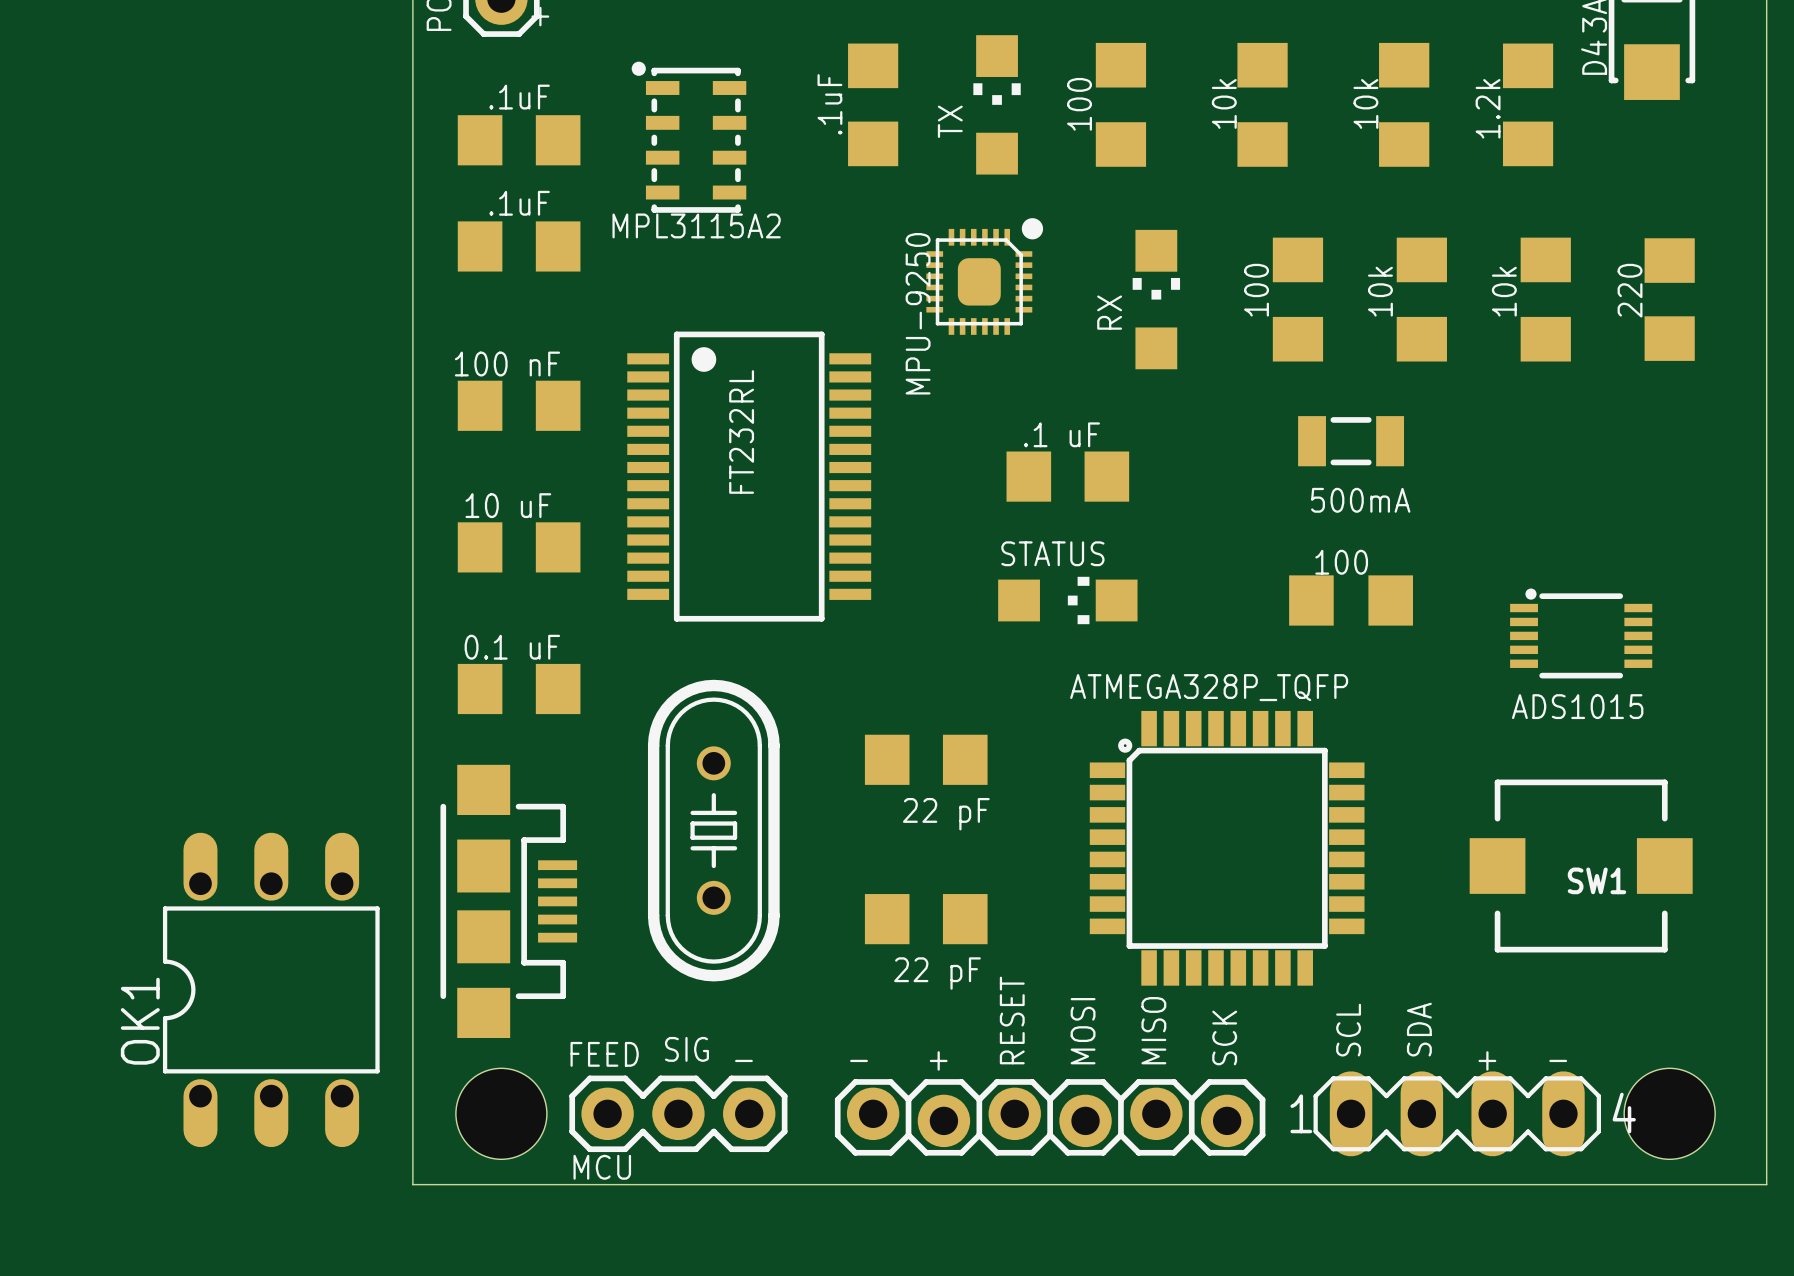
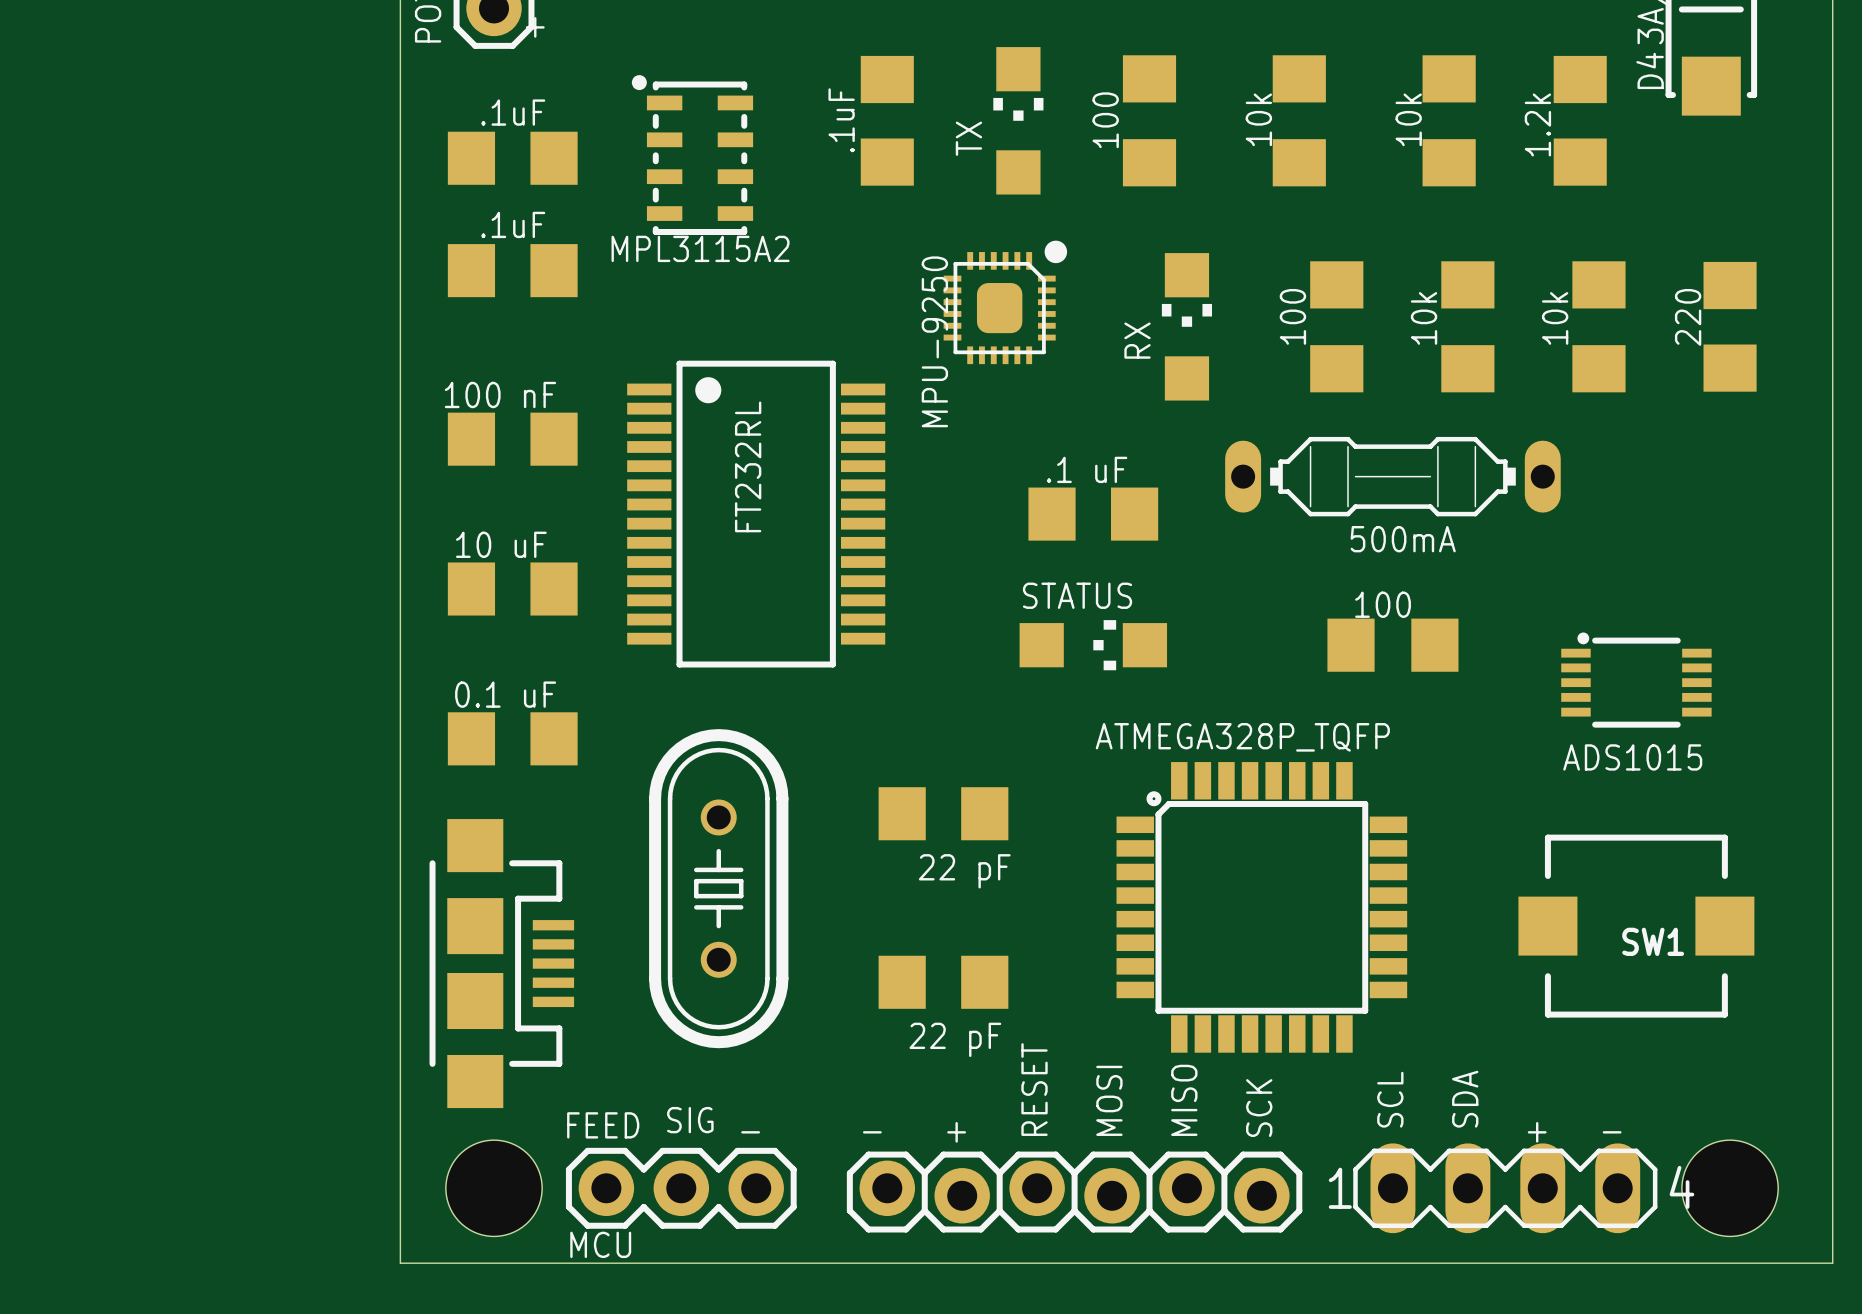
part footprint: [1298, 416, 1405, 467] -> [1225, 436, 1561, 517]
OK1: (271, 989) -> none

